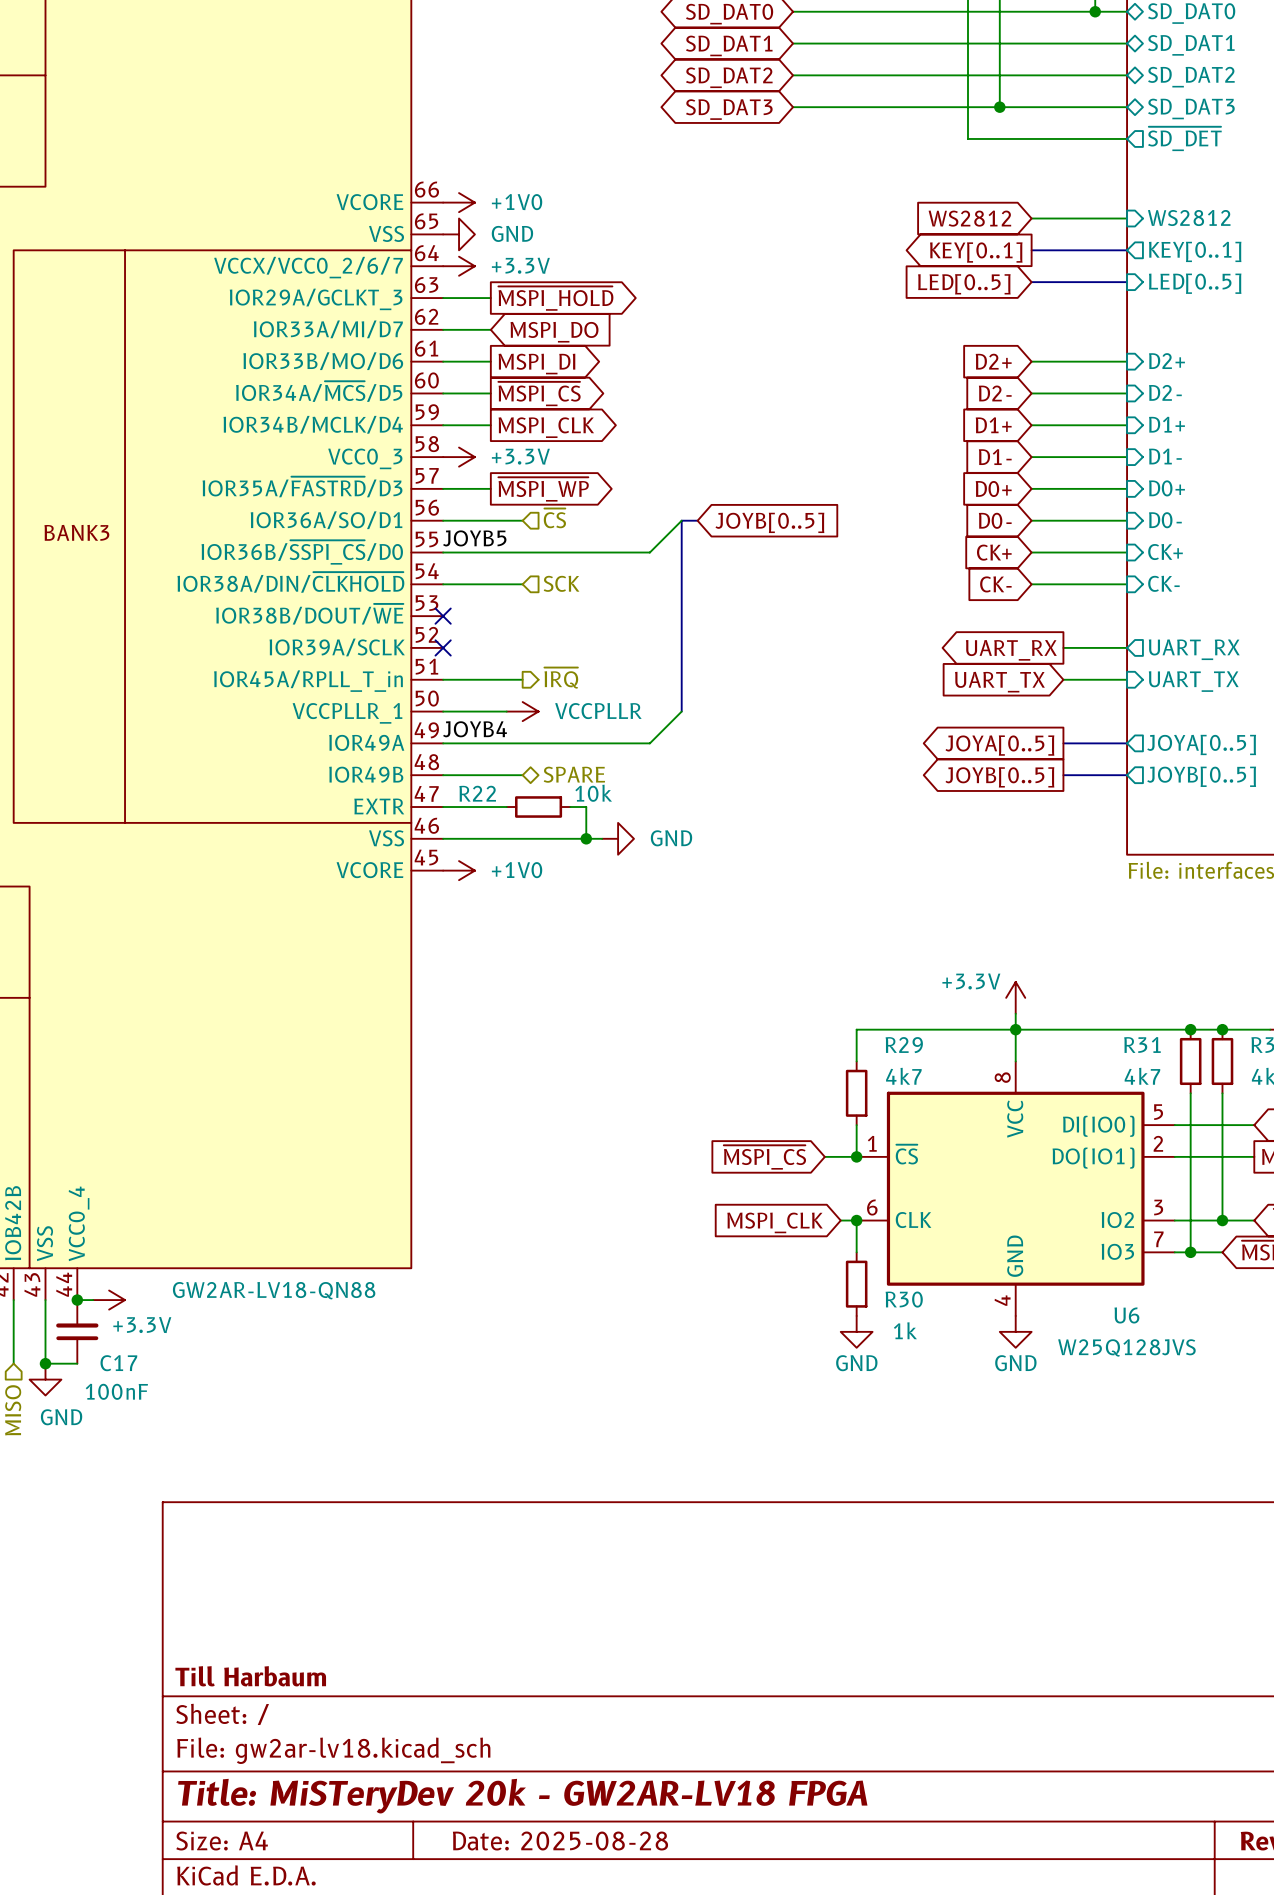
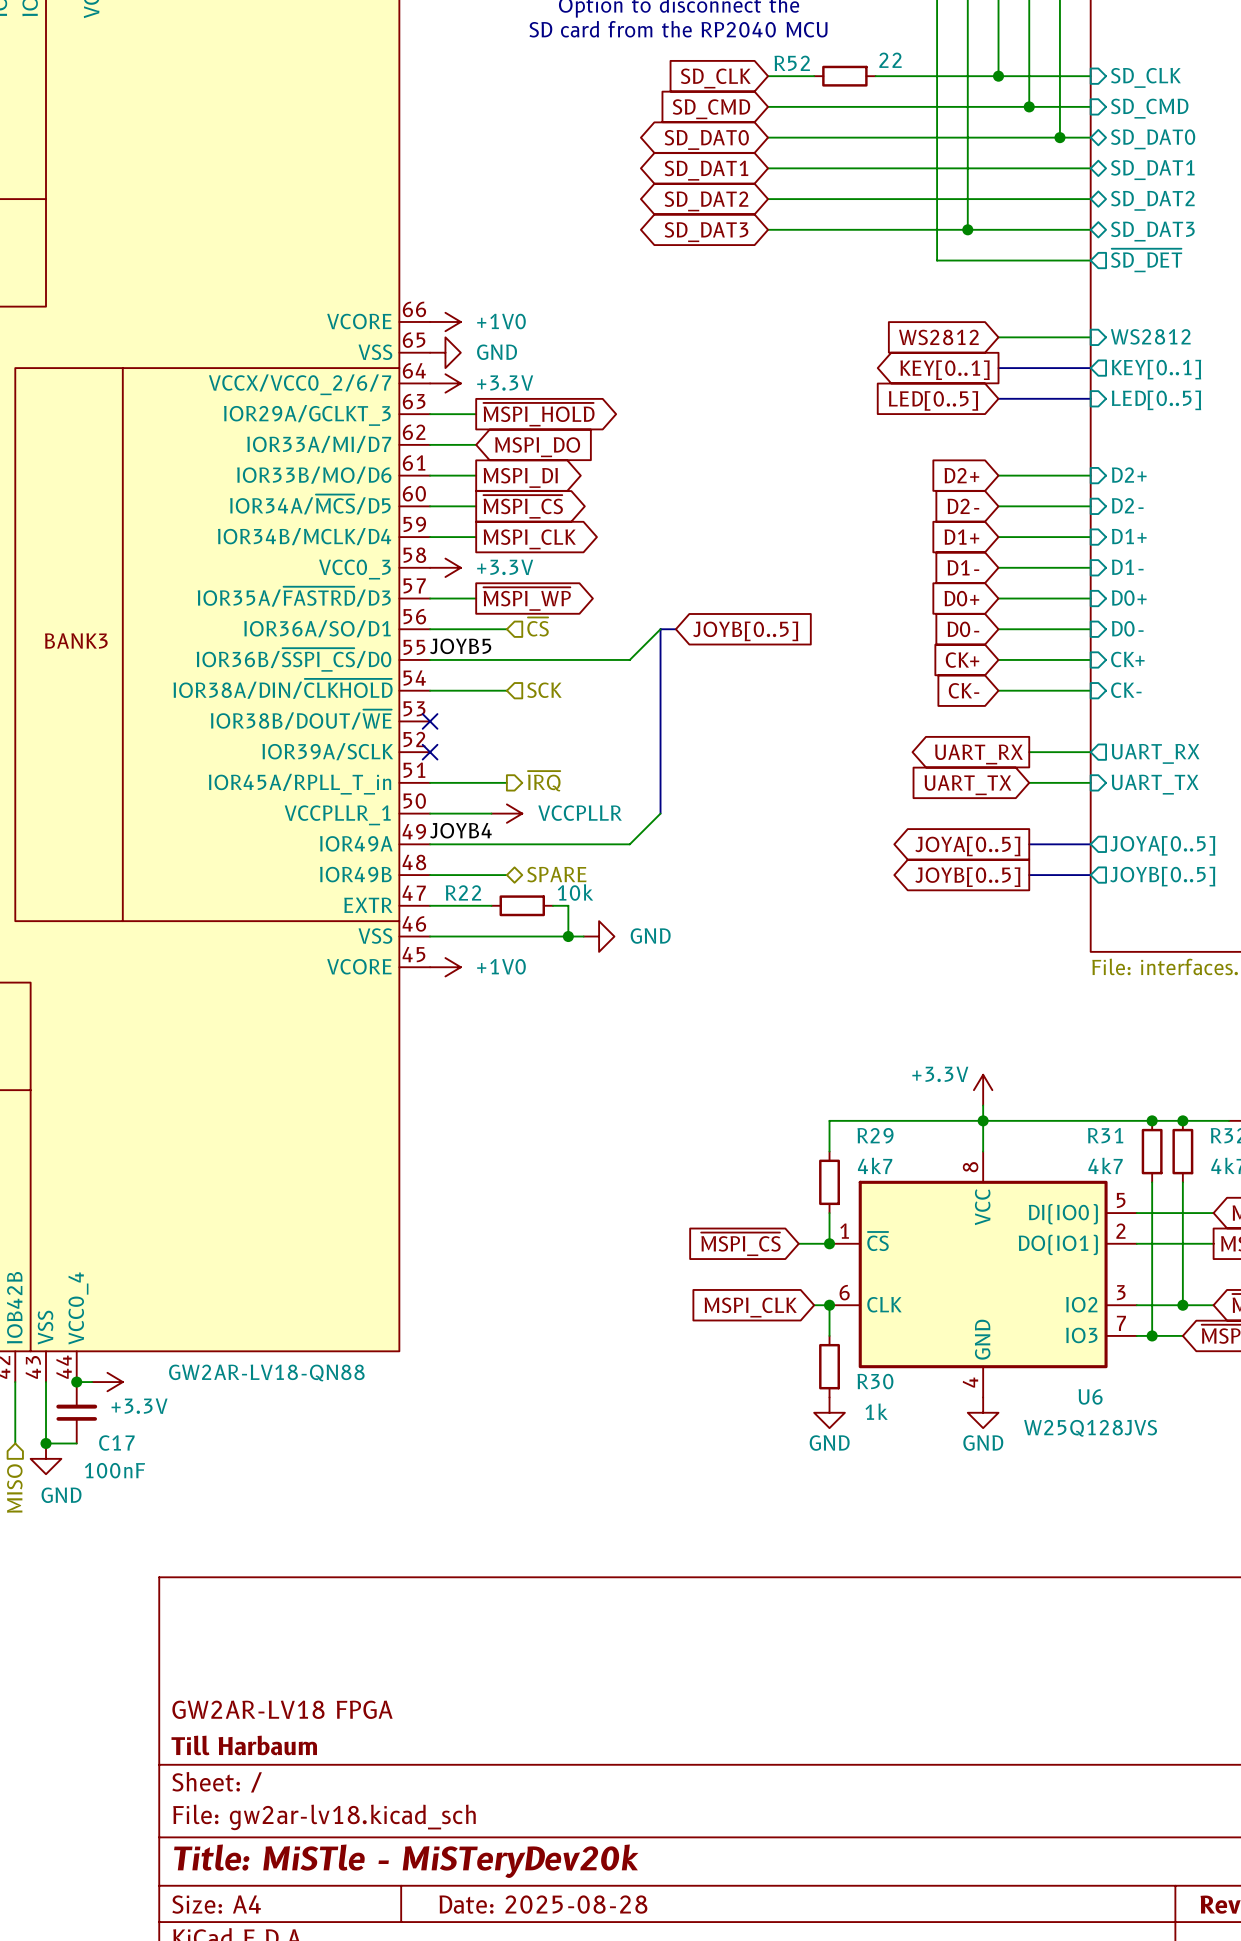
title block: none -> GW2AR-LV18 FPGA (282, 1709)
title block: Title: MiSTeryDev 20k - GW2AR-LV18 FPGA (522, 1796) -> Title: MiSTle - MiSTeryDev20k (406, 1861)

